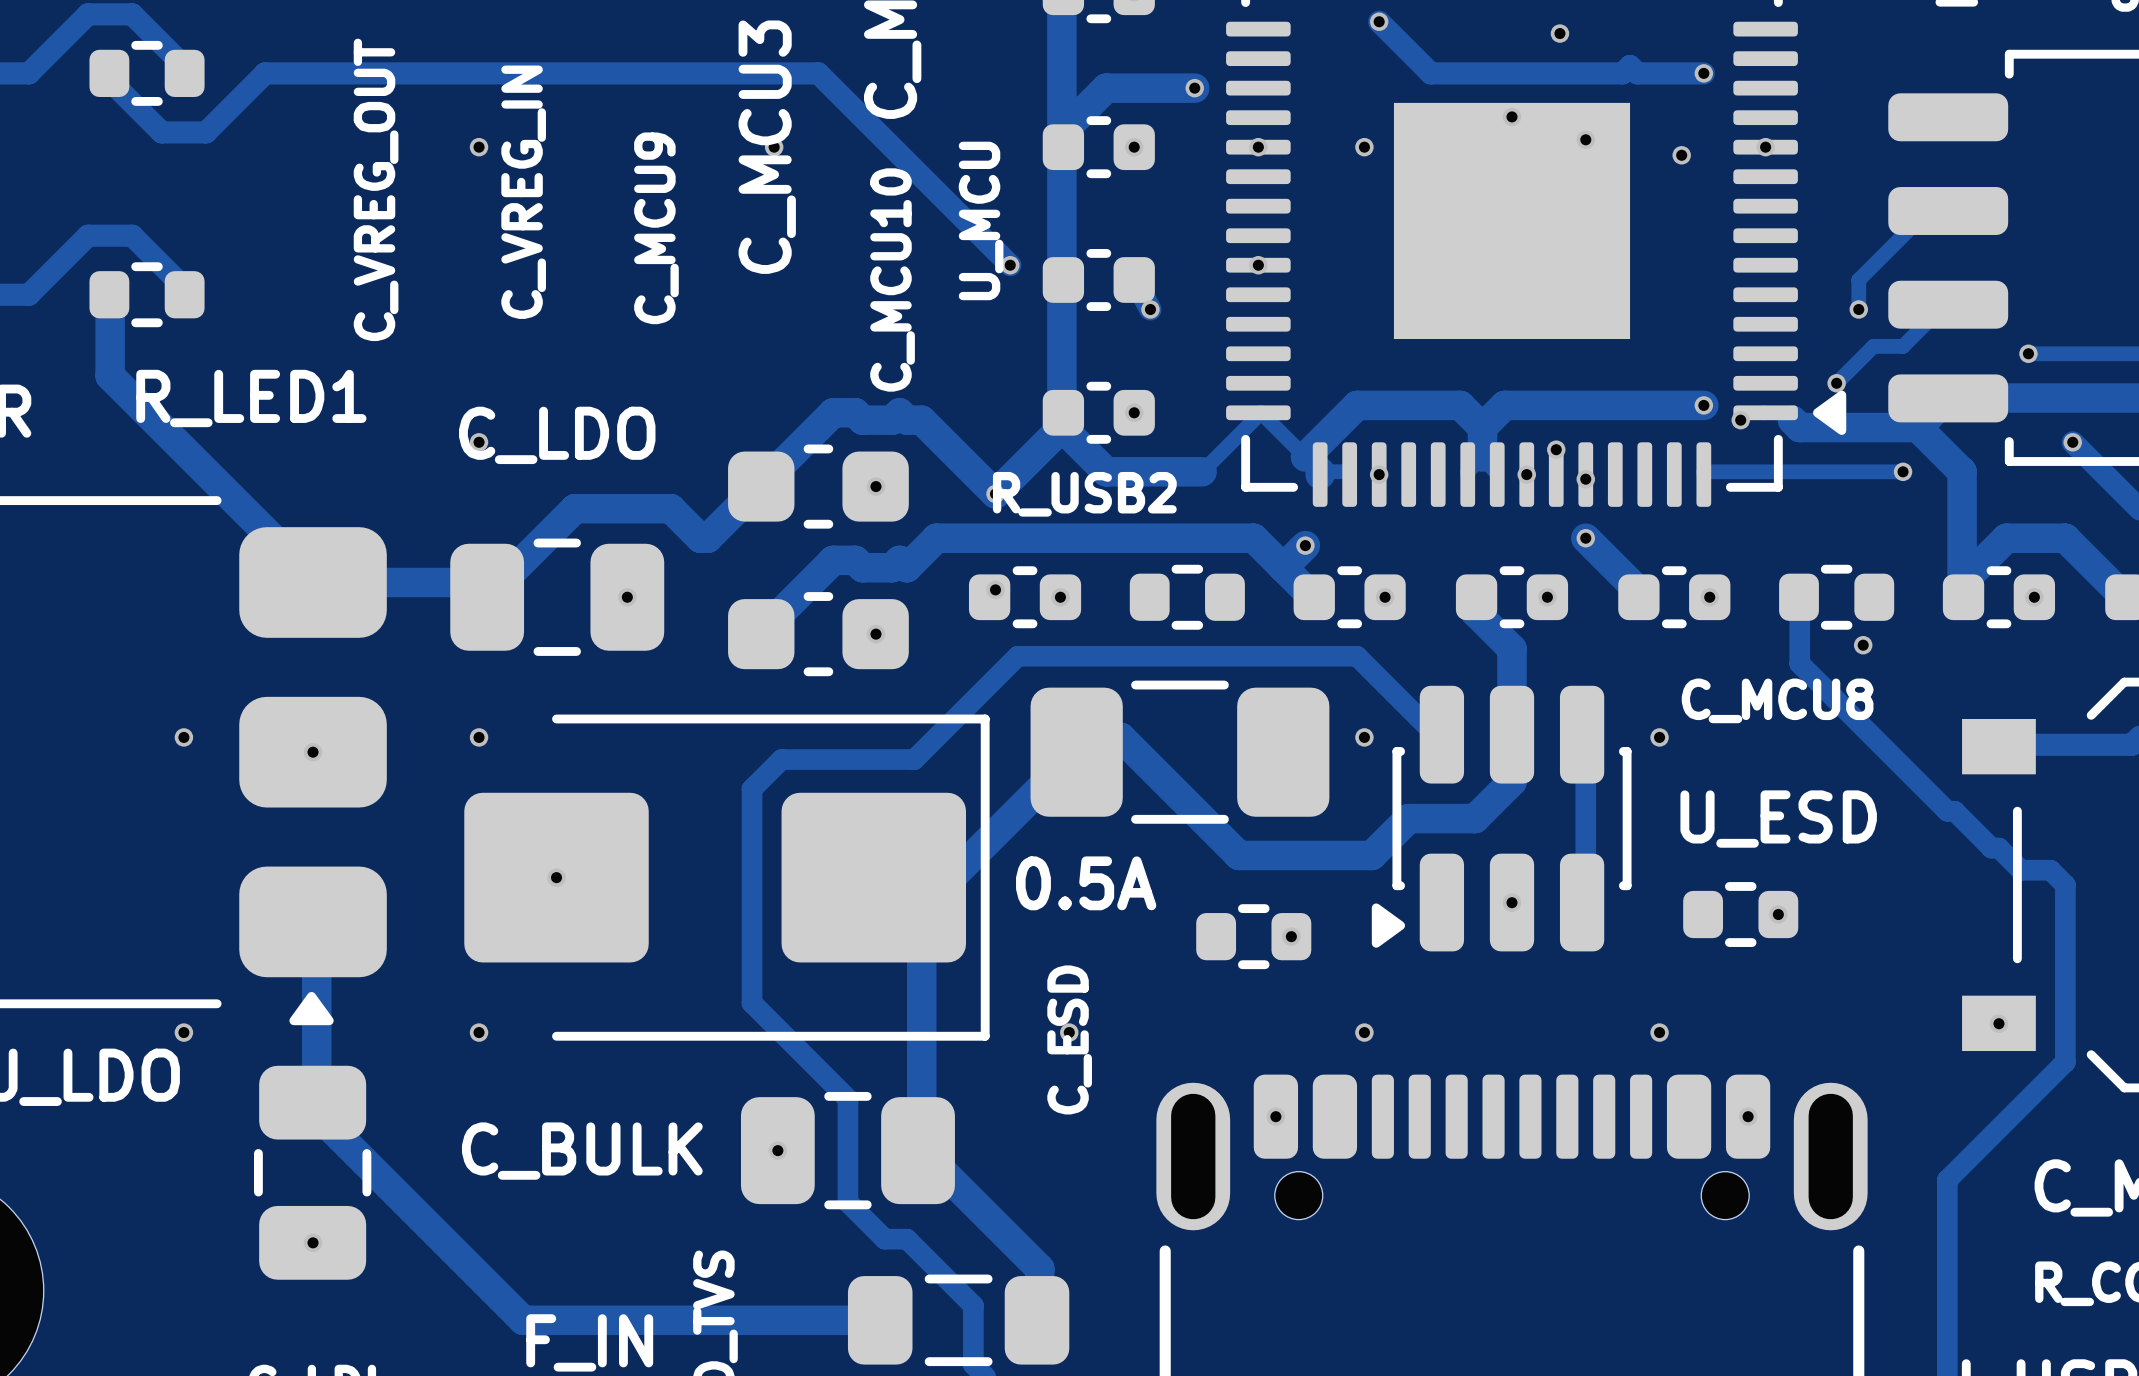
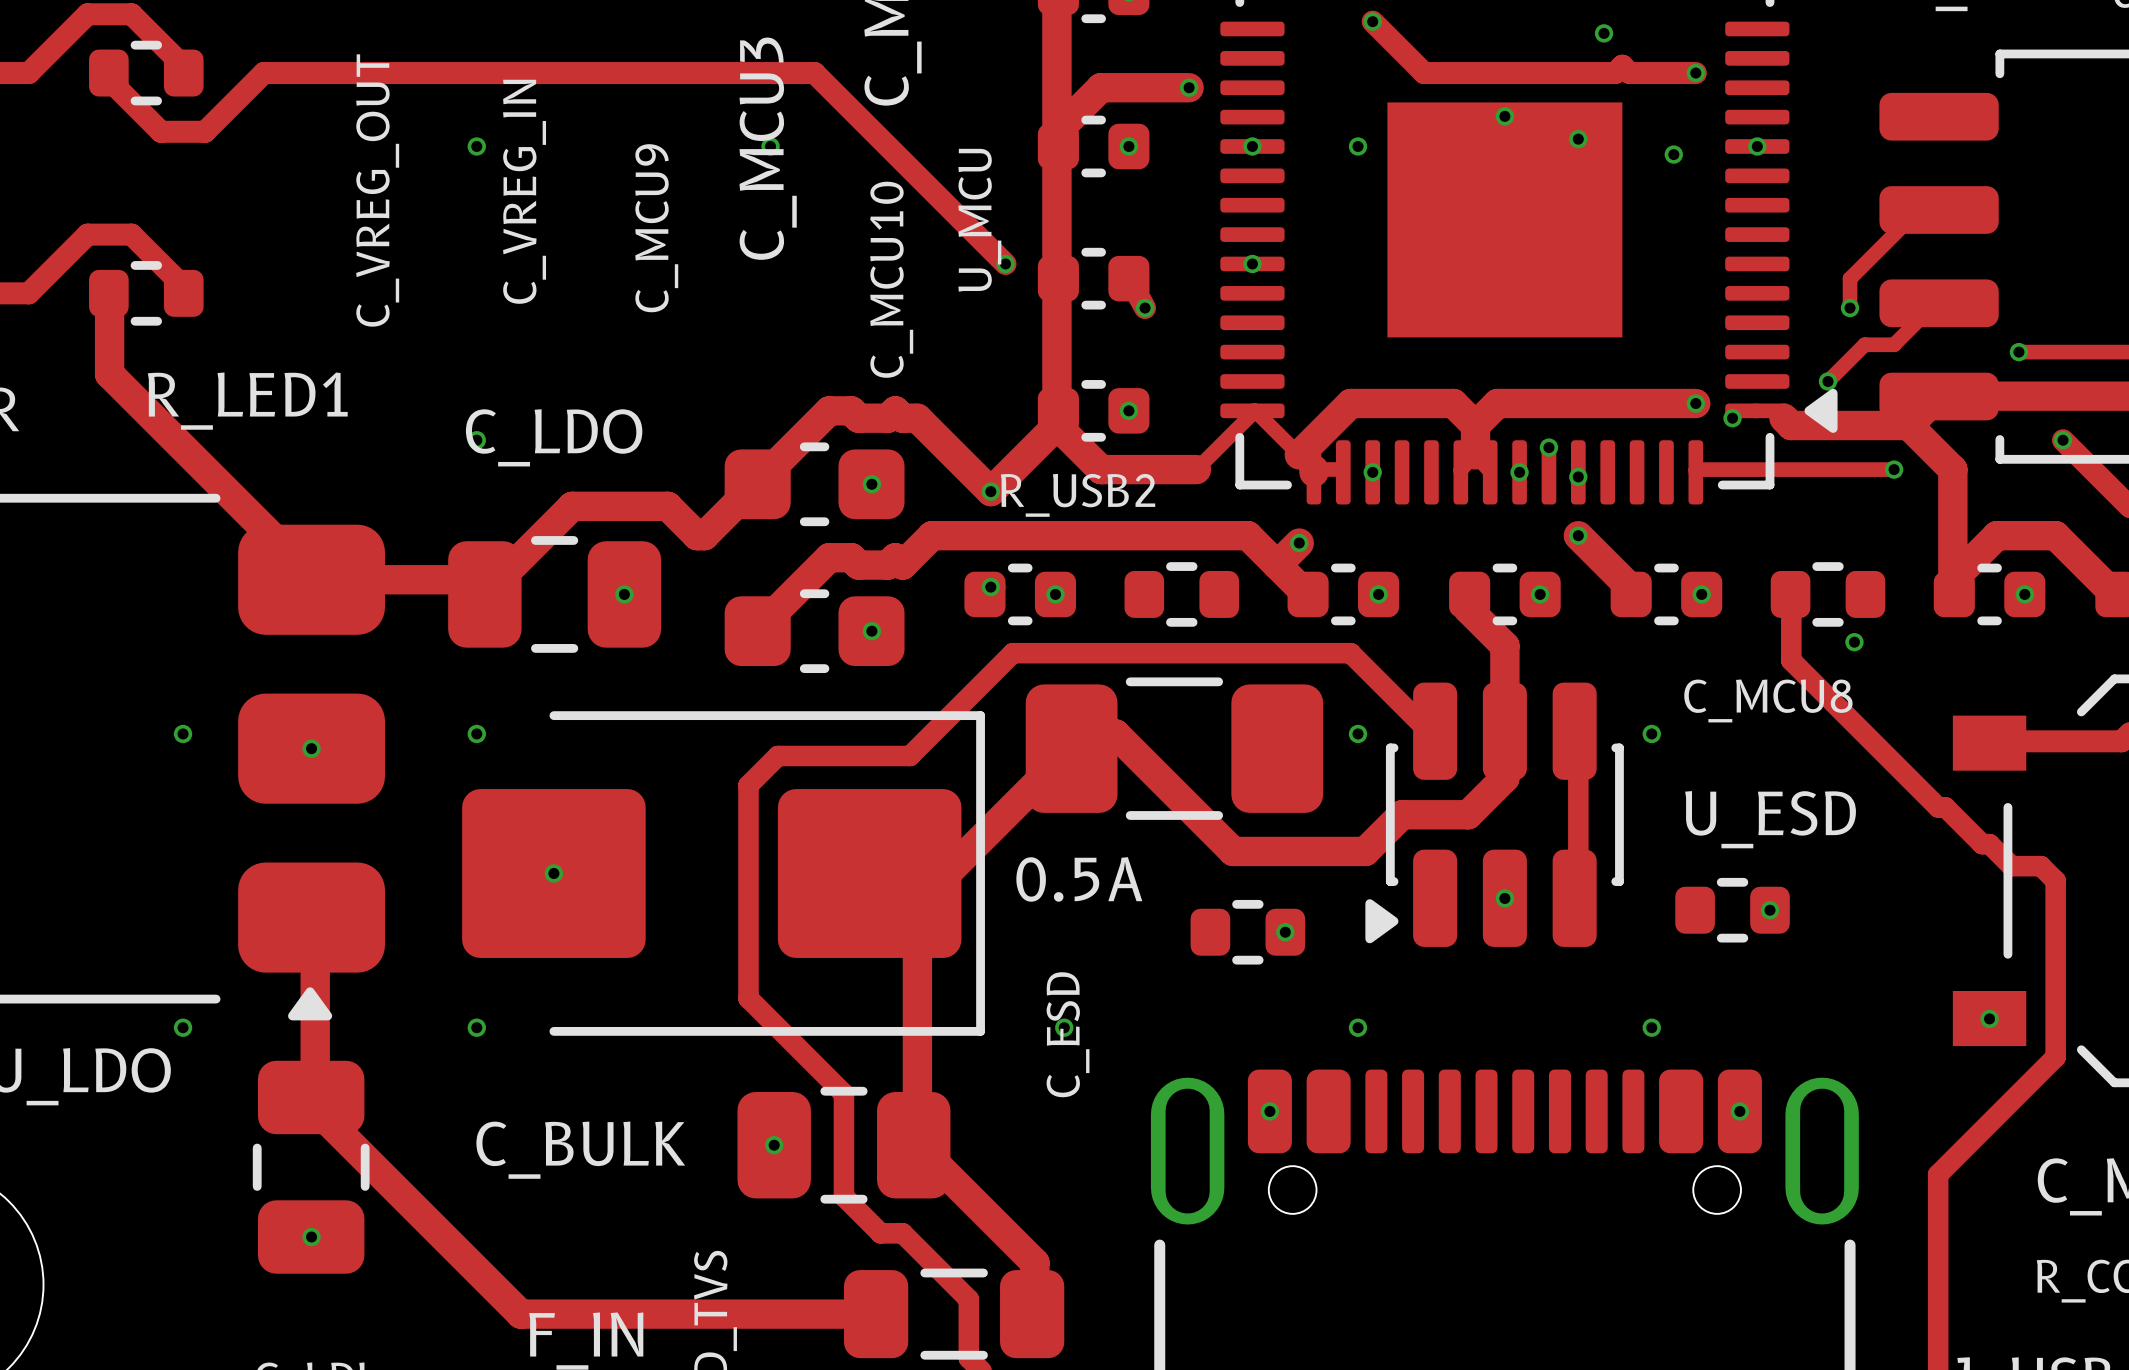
via: (1559, 33) -> none
via: none -> (1604, 33)

